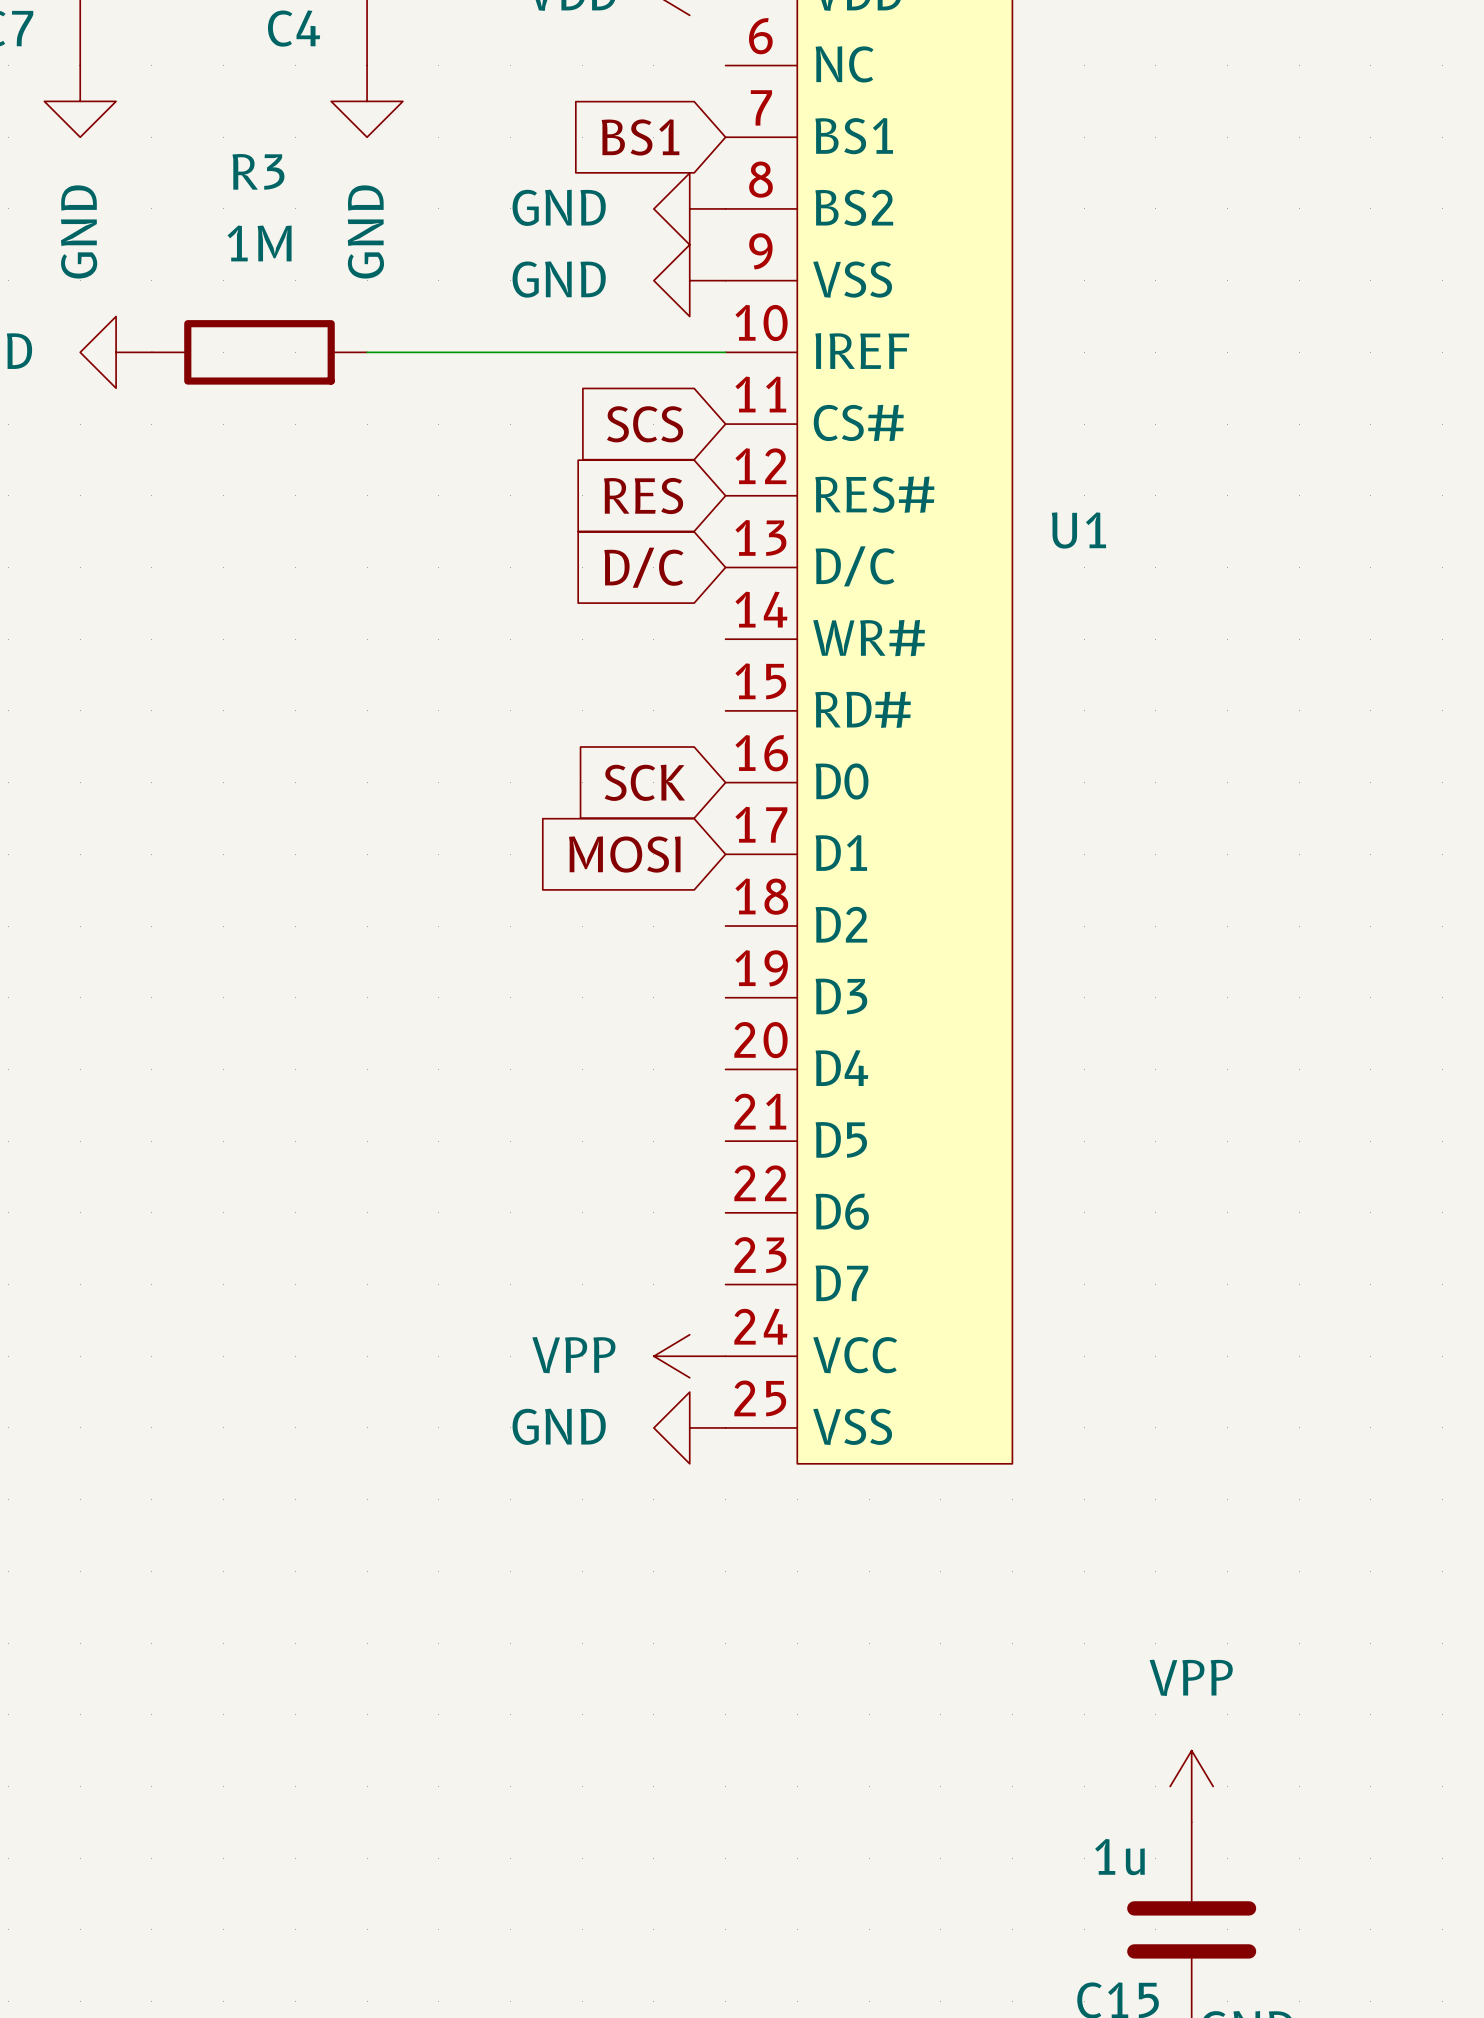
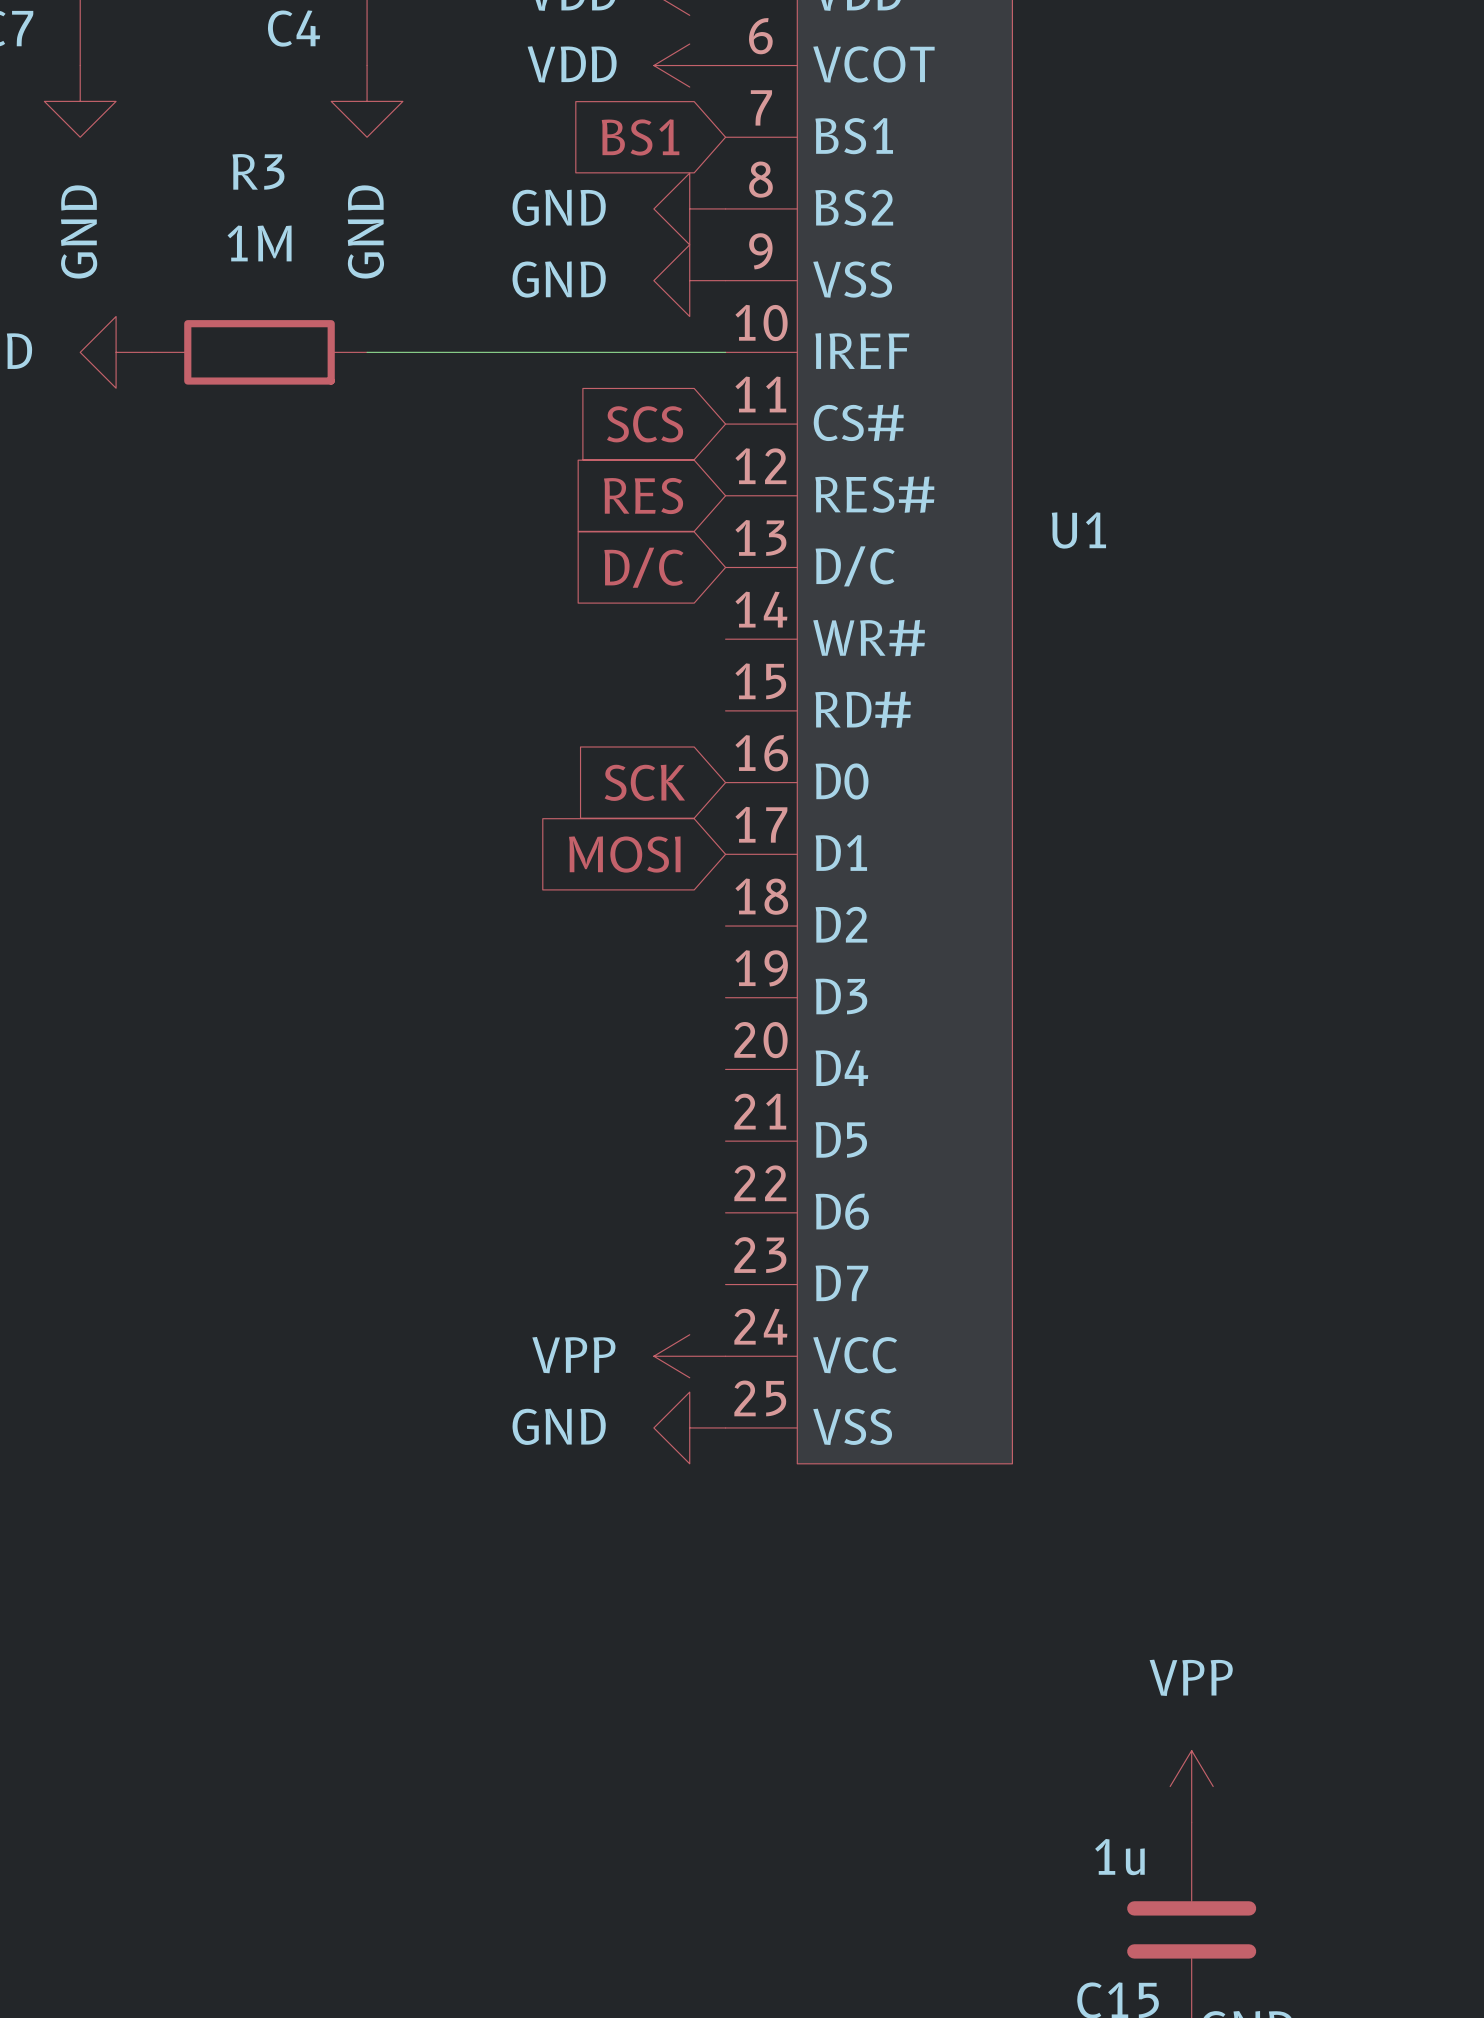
U1 pin name: NC (844, 64) -> VCOT (873, 64)
power symbol: none -> VDD (689, 65)

